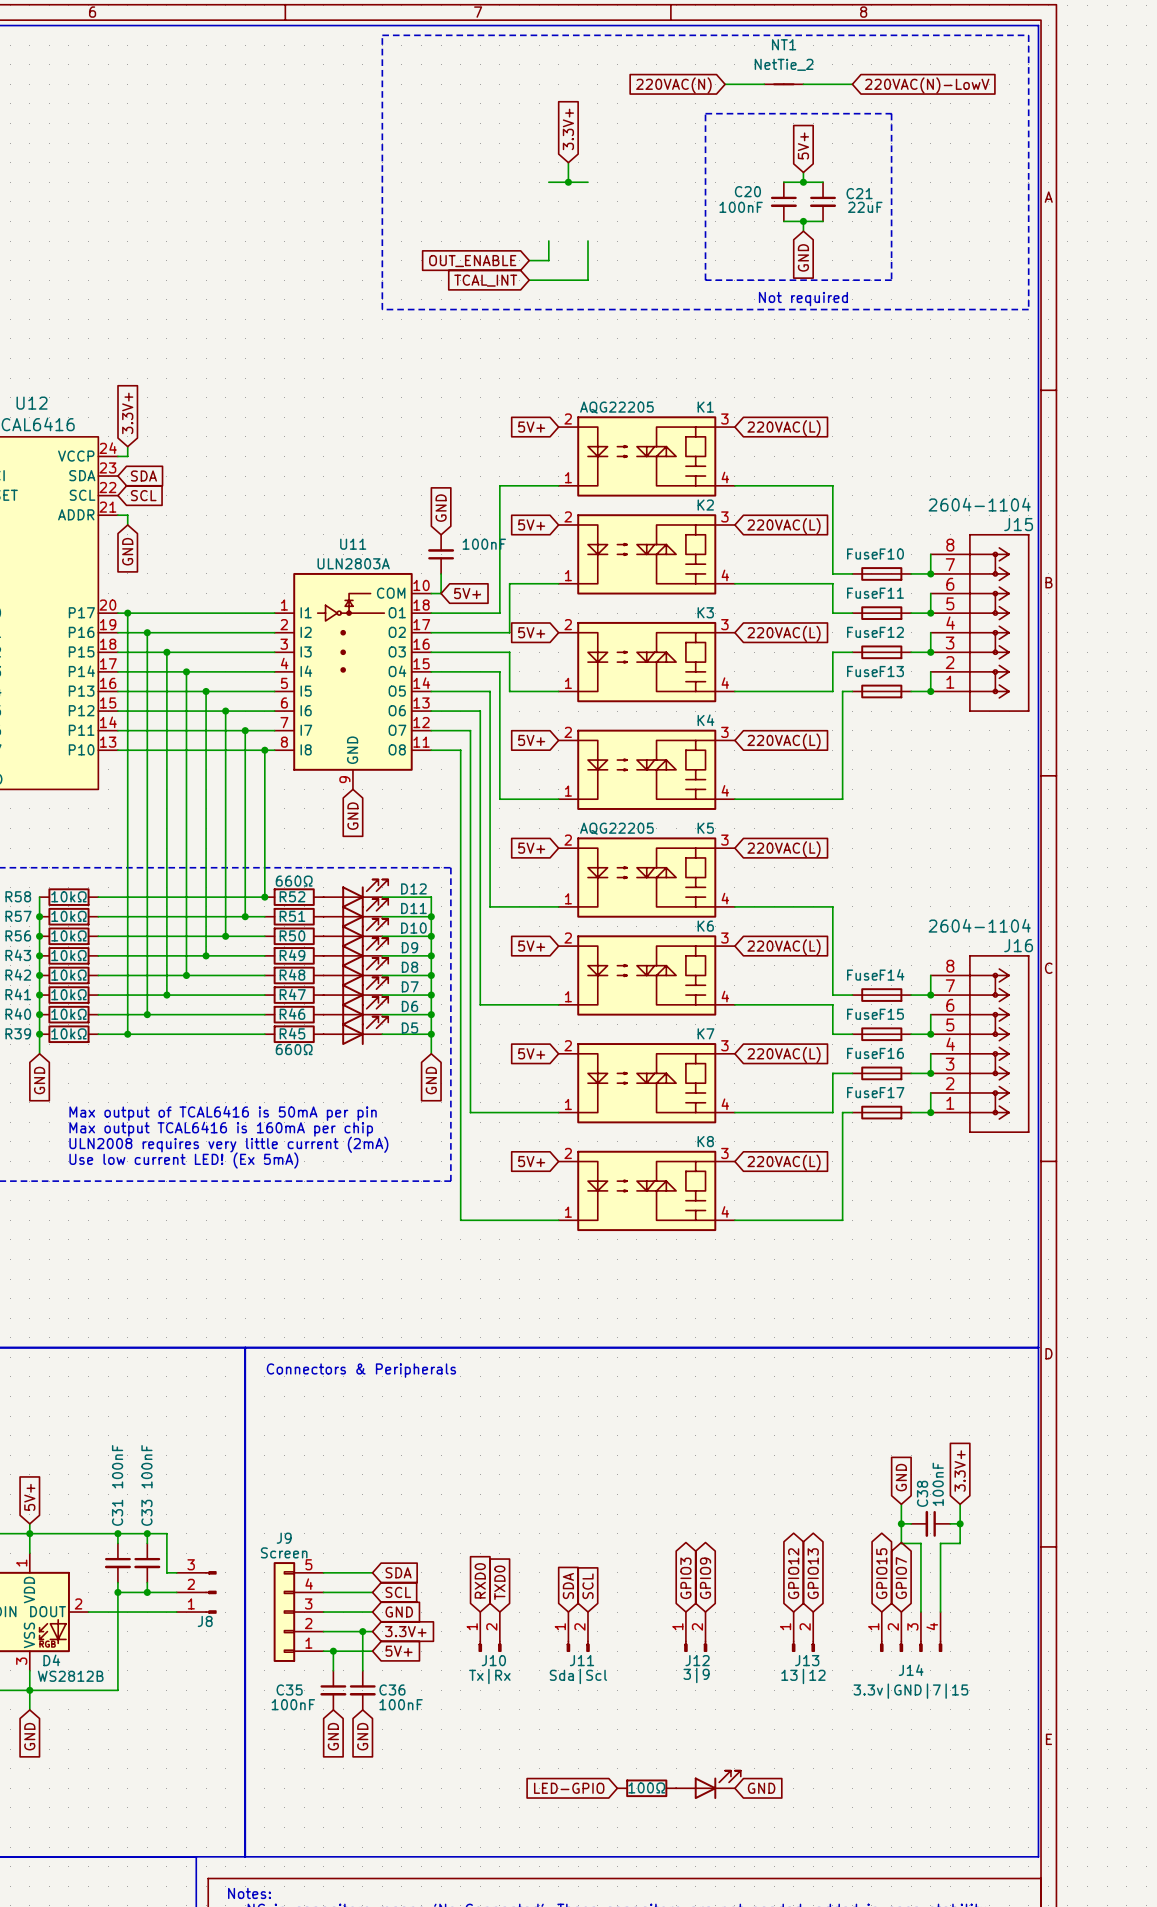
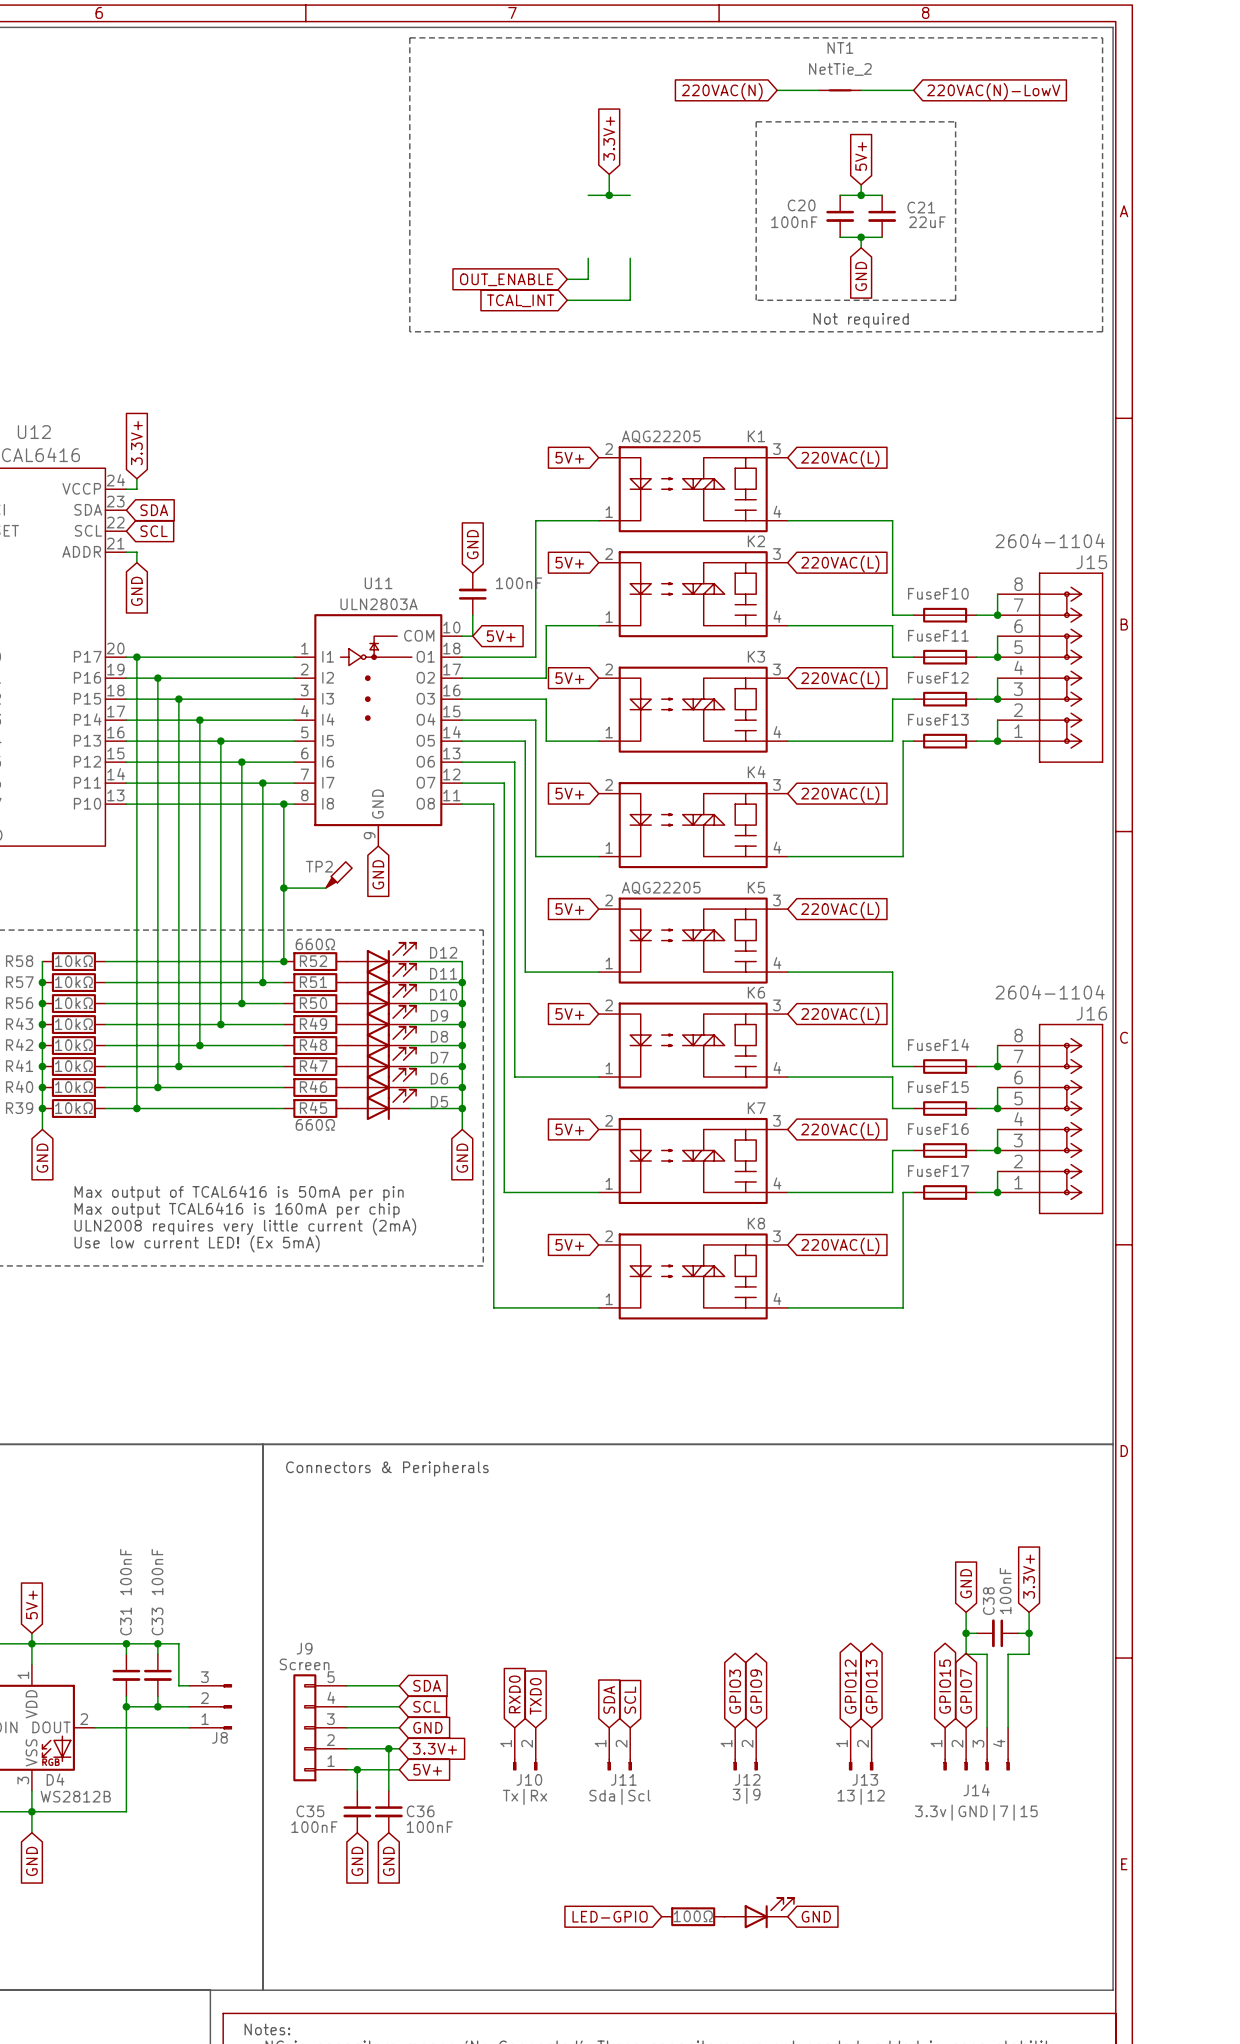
TP2: none -> (338, 874)
wire: none -> (283, 888) (325, 888)
junction: none -> (283, 888)

